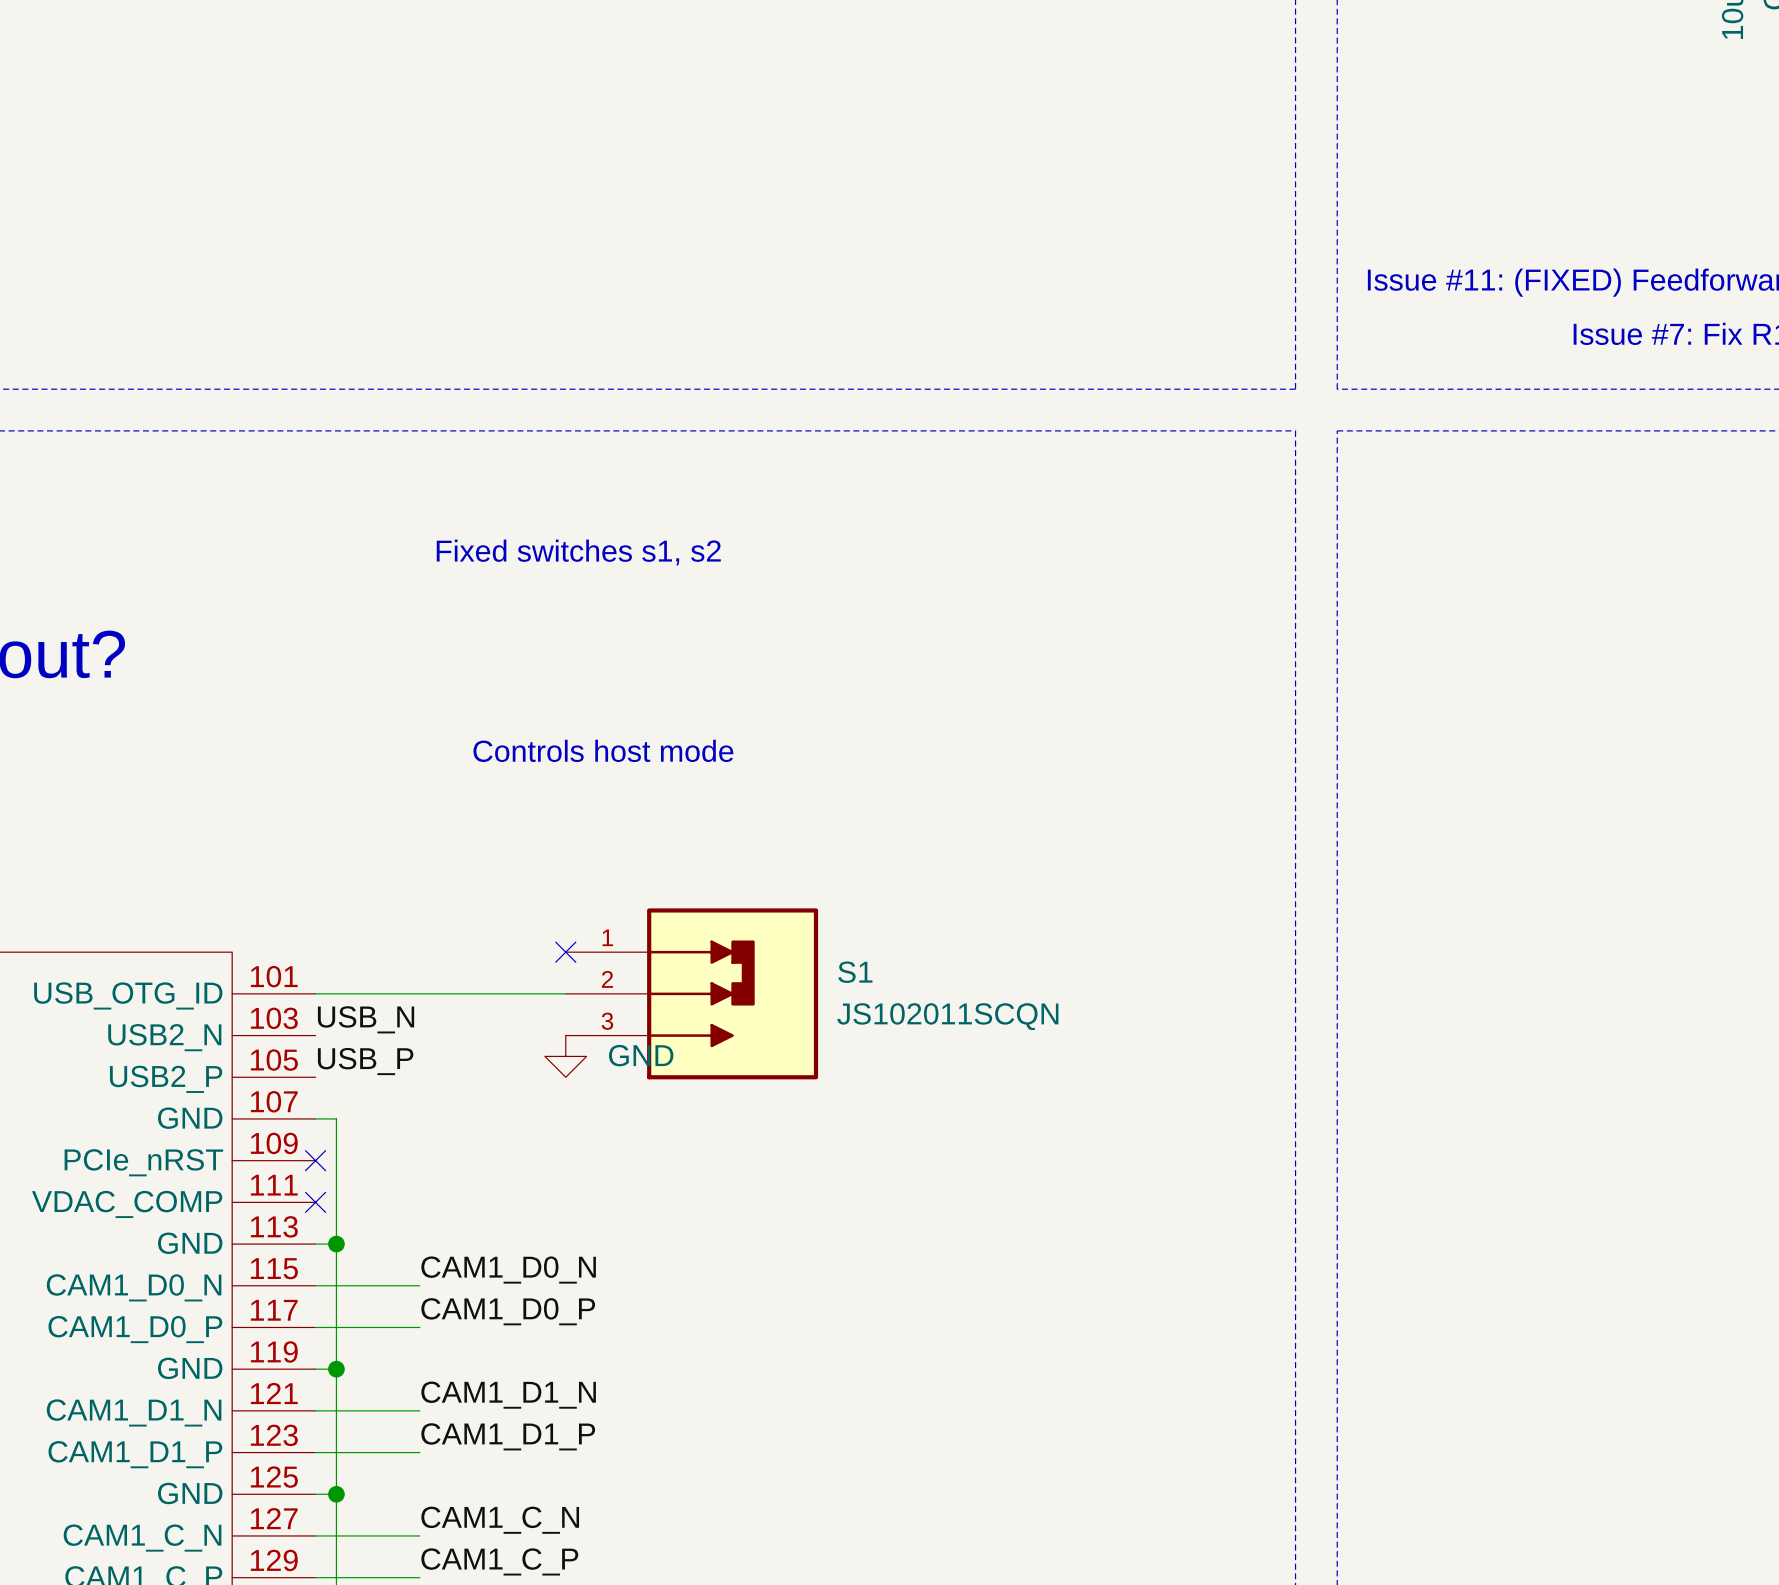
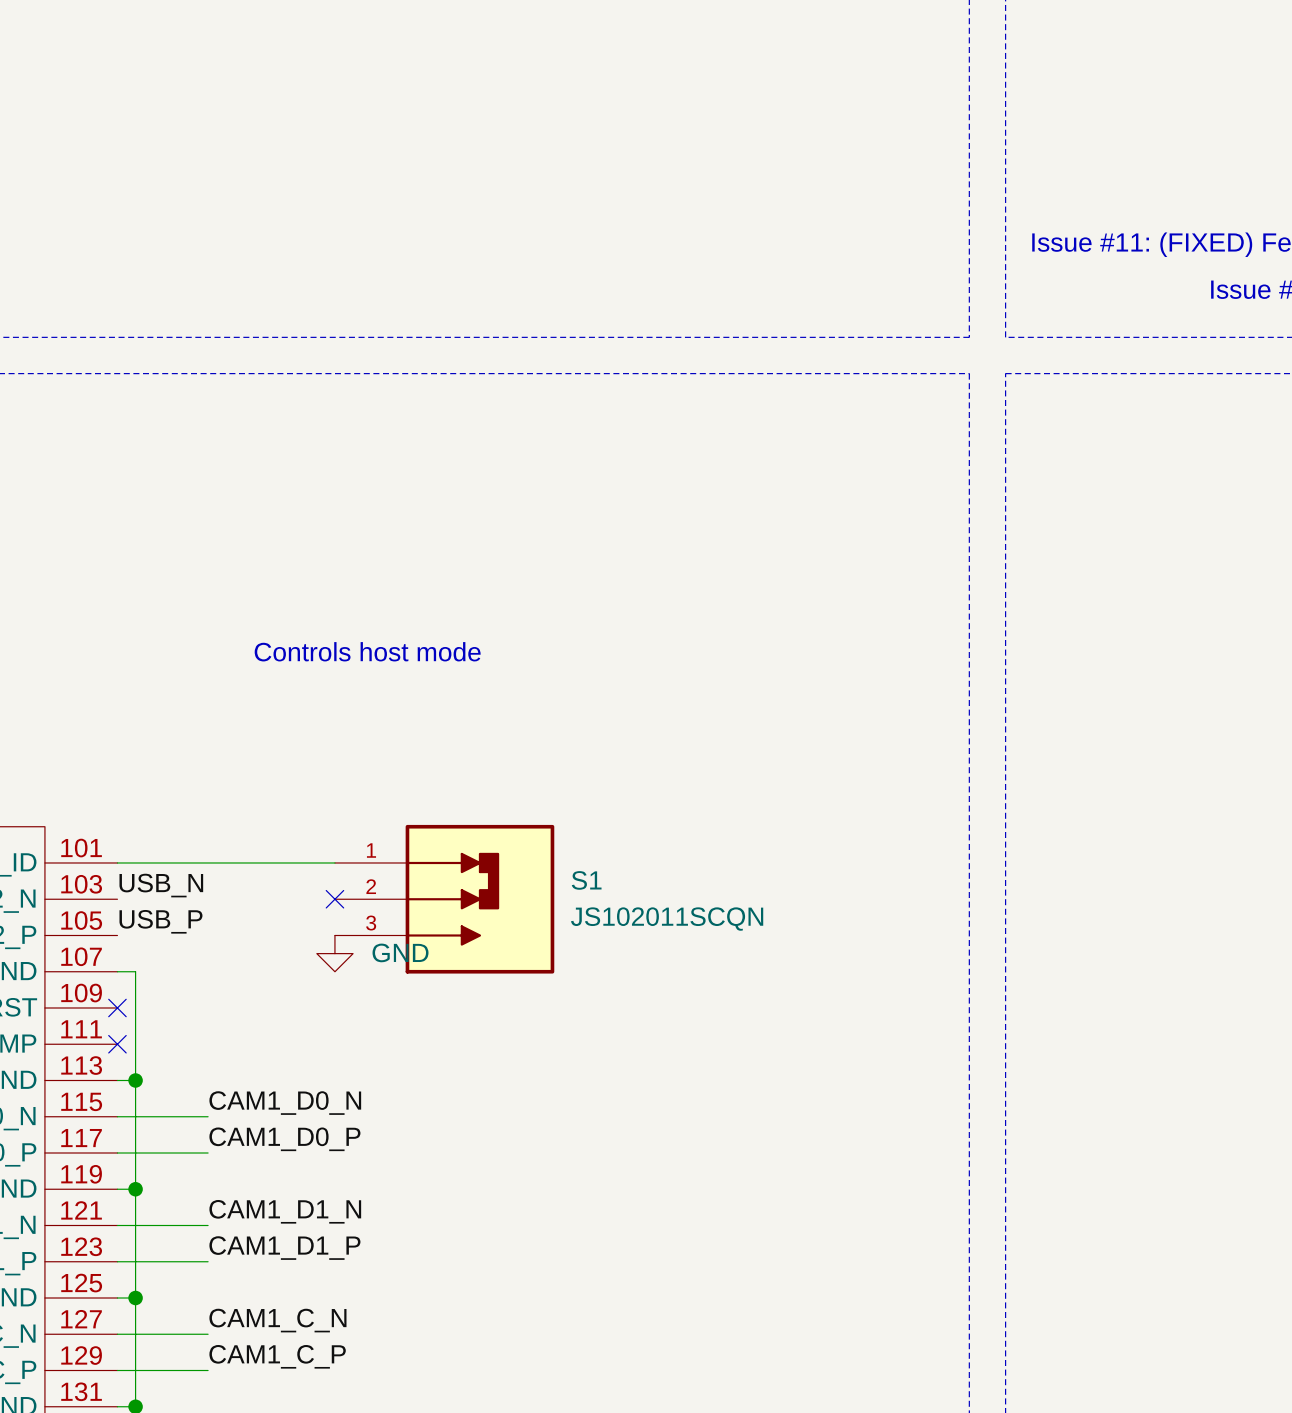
text: Fixed switches s1, s2 (578, 552) -> none
no-connect mark position: (565, 952) -> (334, 899)
S1 position: (691, 993) -> (444, 899)
power symbol position: GND (565, 1056) -> GND (334, 953)

